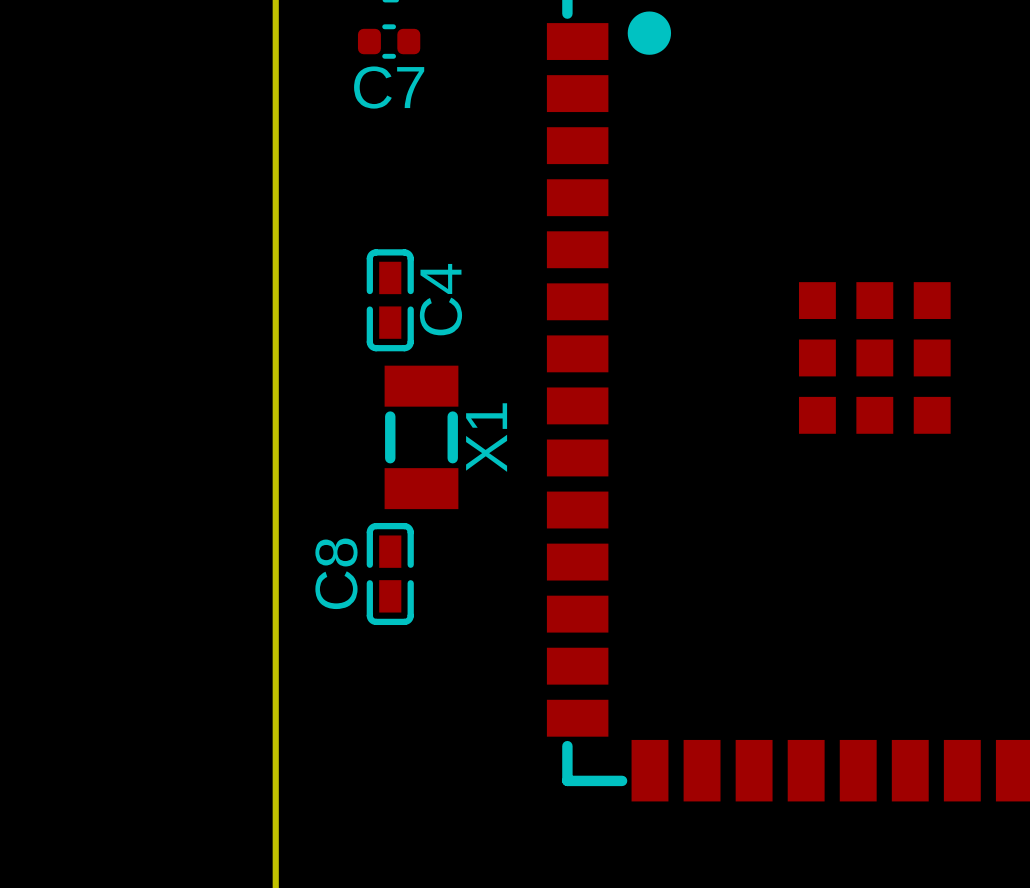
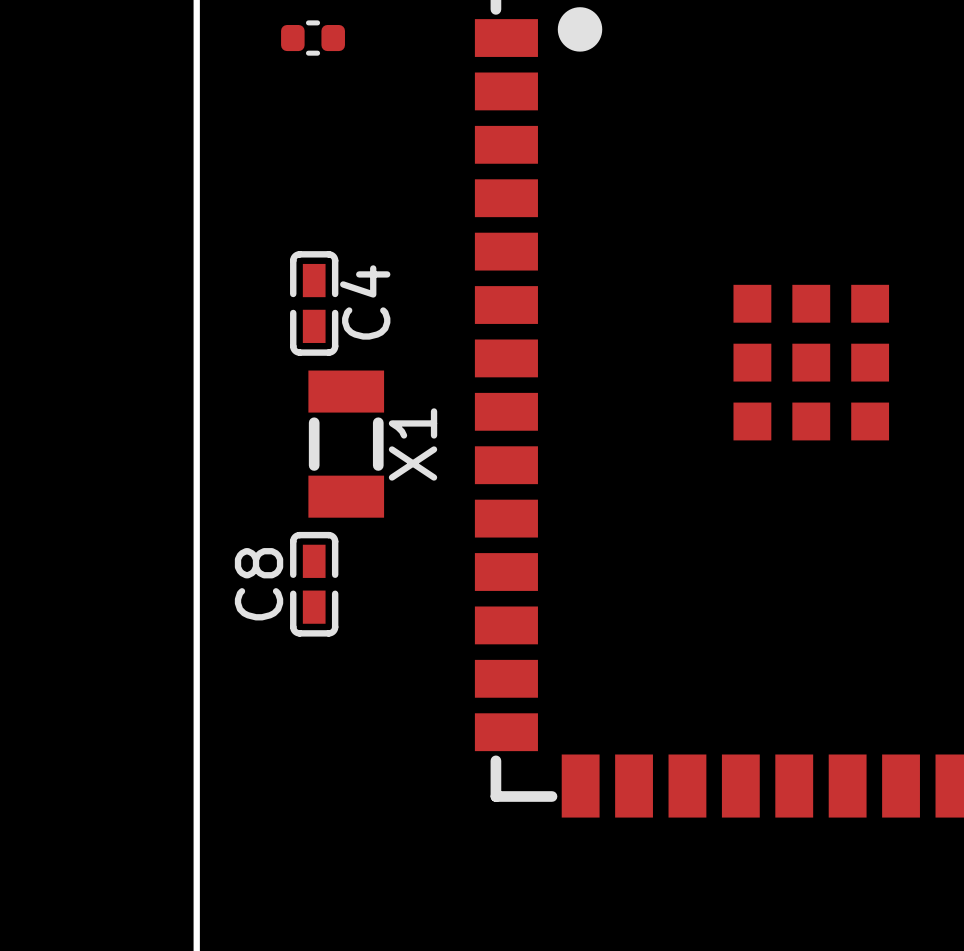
C7 name: C7 (389, 87) -> none

